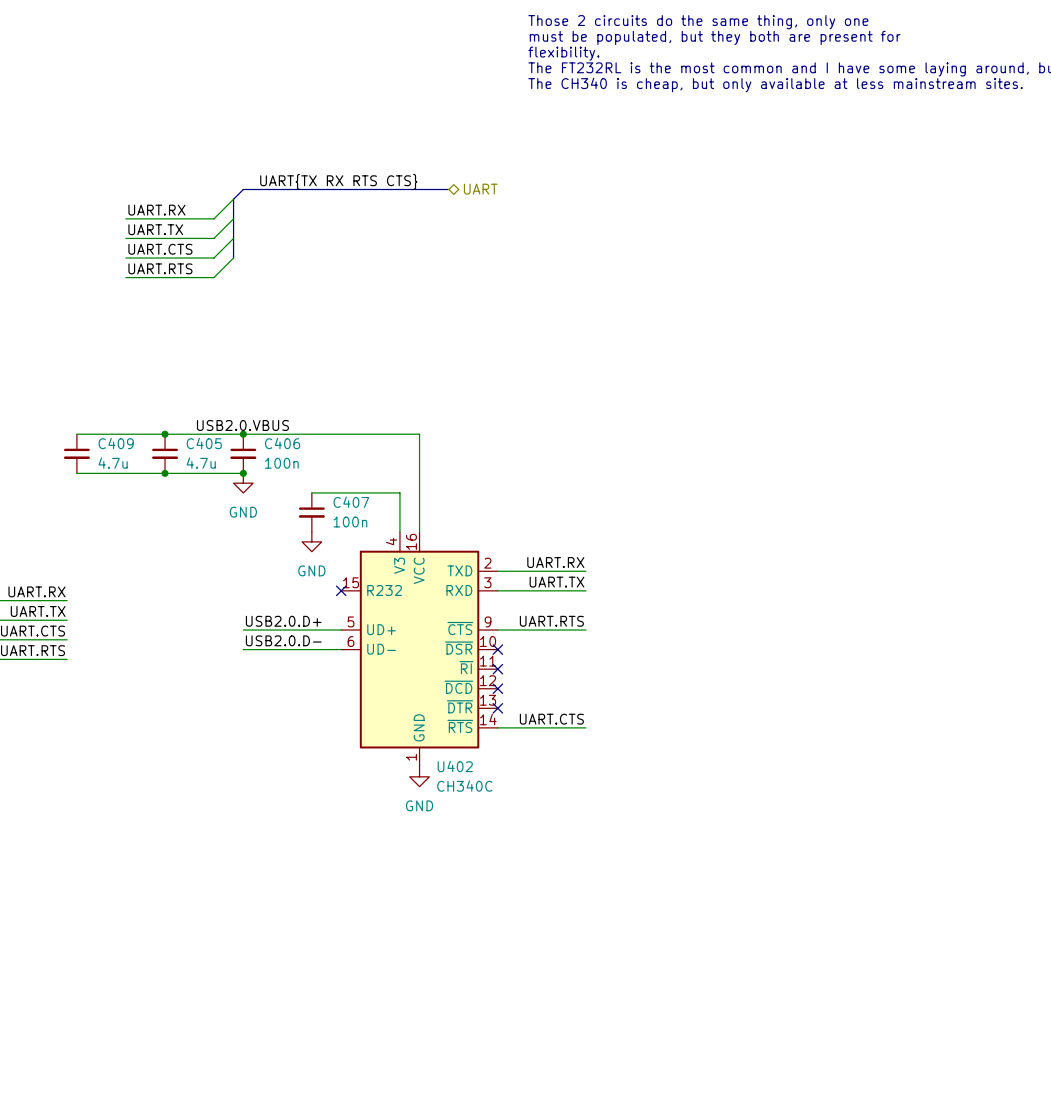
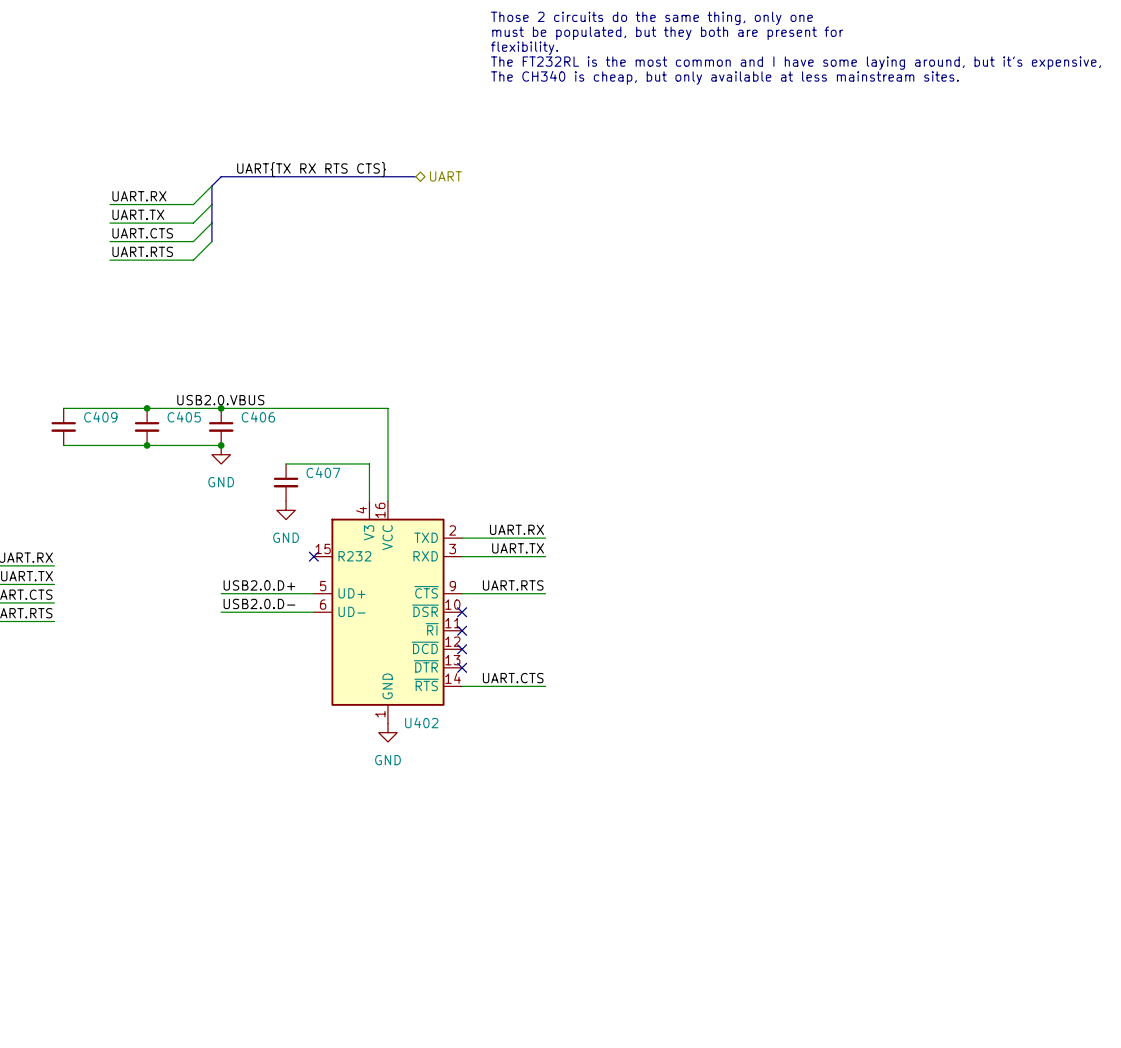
C409 value: 4.7u (113, 463) -> none
C405 value: 4.7u (201, 463) -> none
C406 value: 100n (281, 463) -> none
C407 value: 100n (350, 522) -> none
U402 value: CH340C (464, 786) -> none

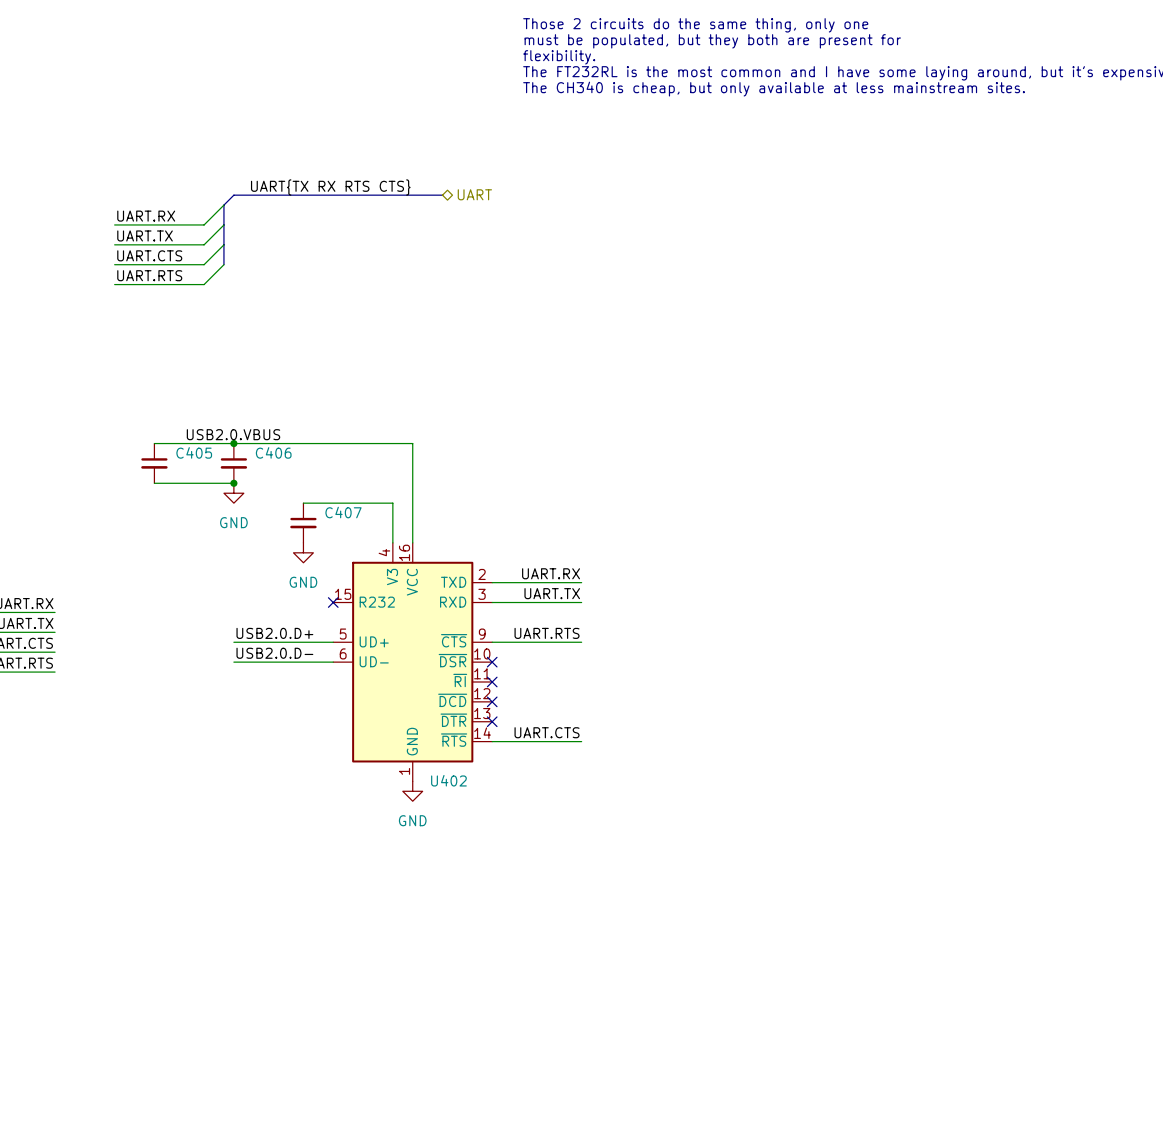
wire: (63, 408) (147, 408) -> none
junction: (147, 408) -> none
C409: (63, 426) -> none
wire: (63, 445) (147, 445) -> none
junction: (147, 445) -> none

